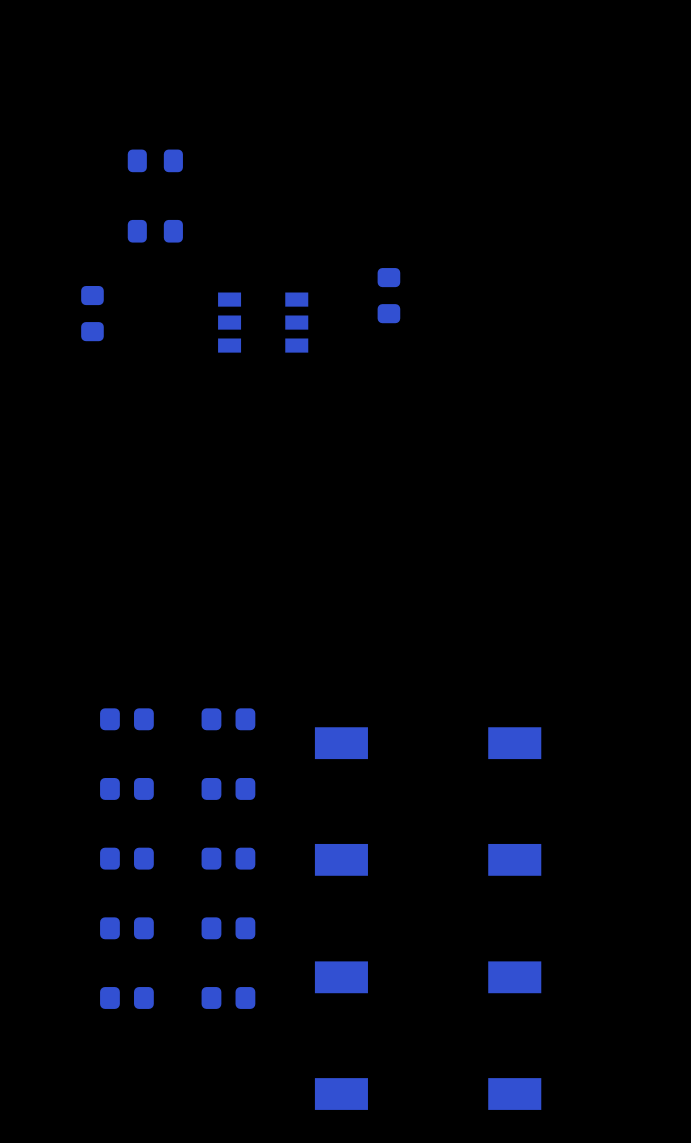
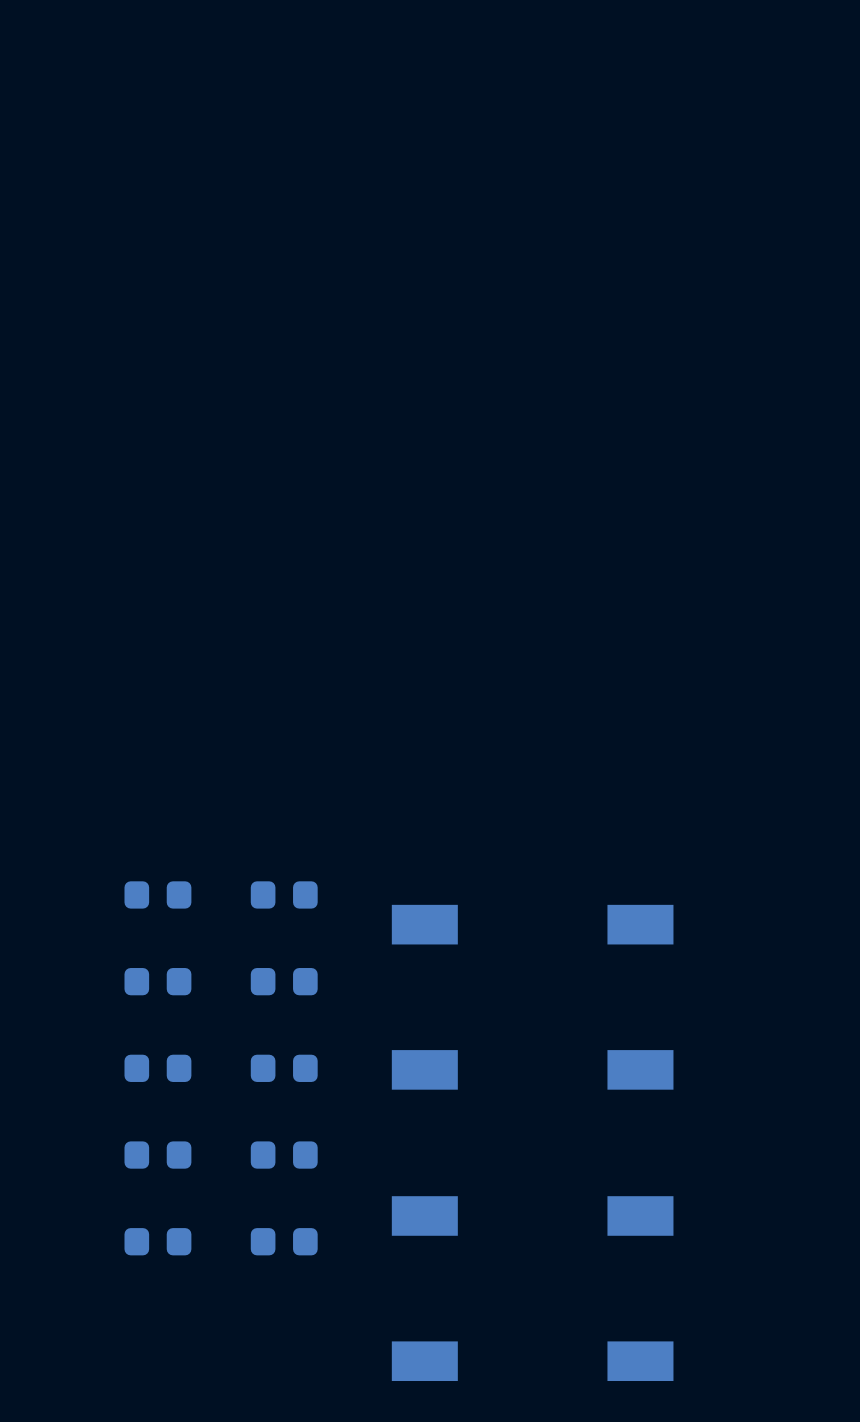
part: (155, 160) -> none
part: (155, 231) -> none
part: (388, 295) -> none
part: (92, 313) -> none
part: (263, 322) -> none

